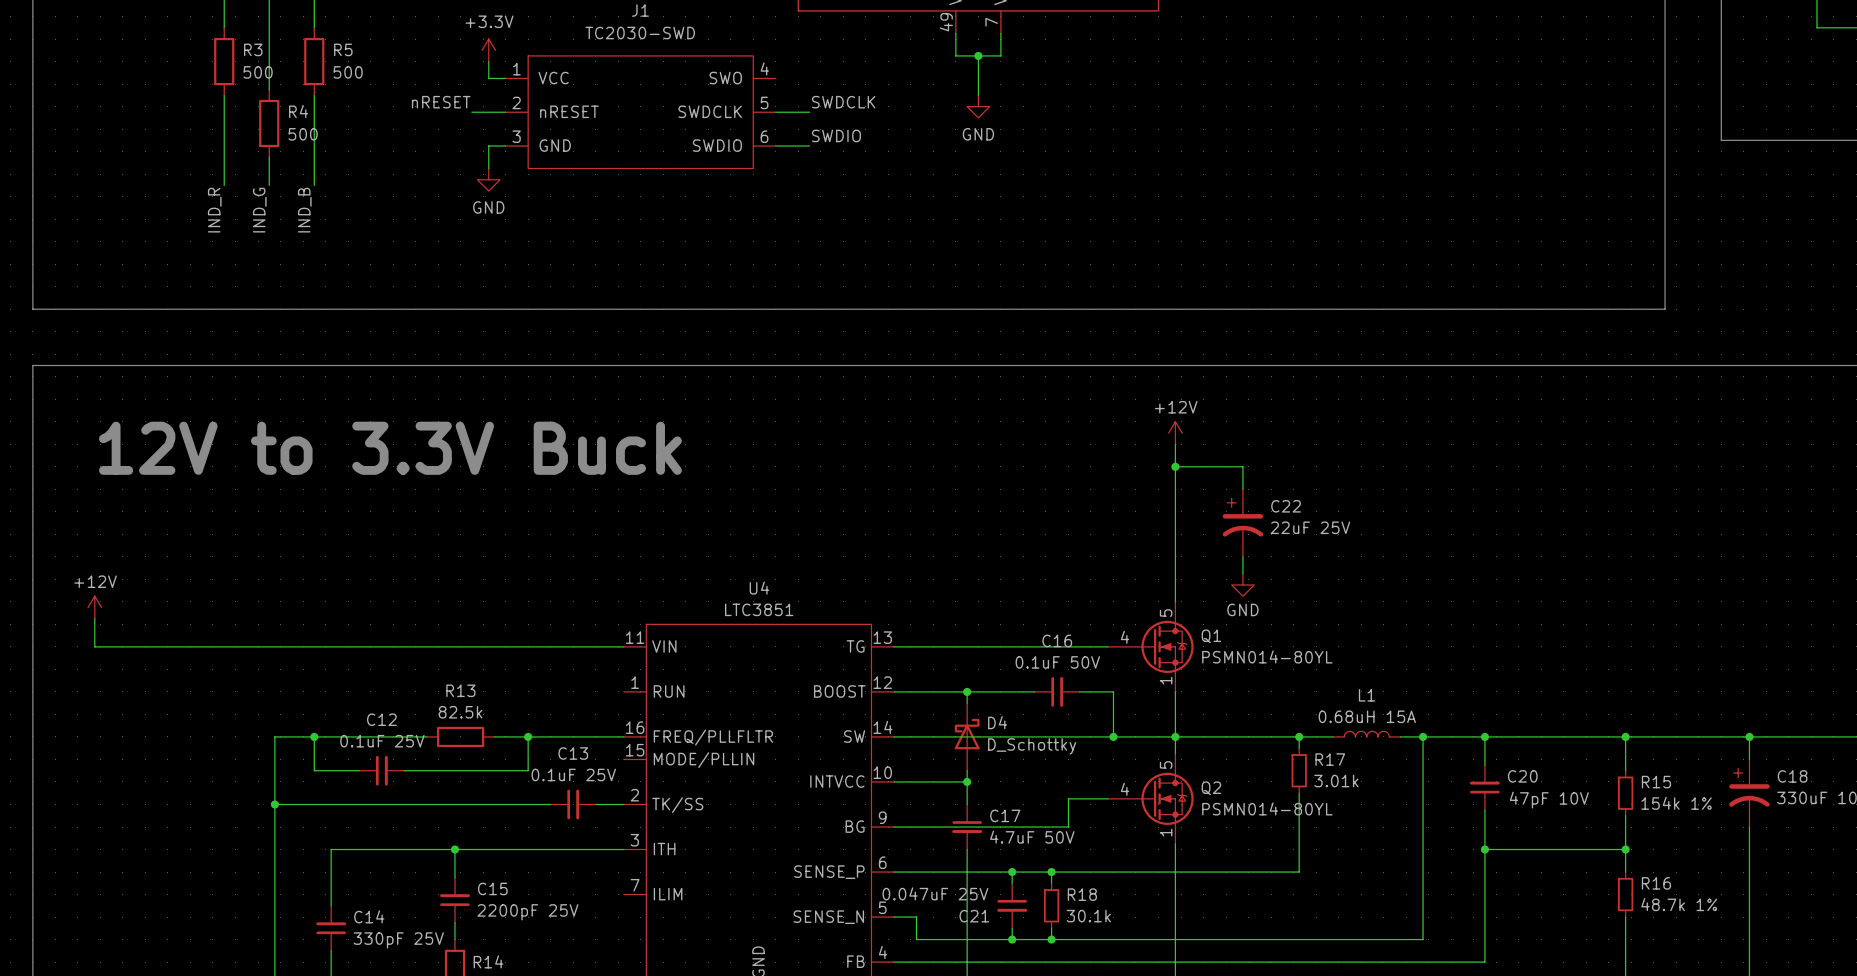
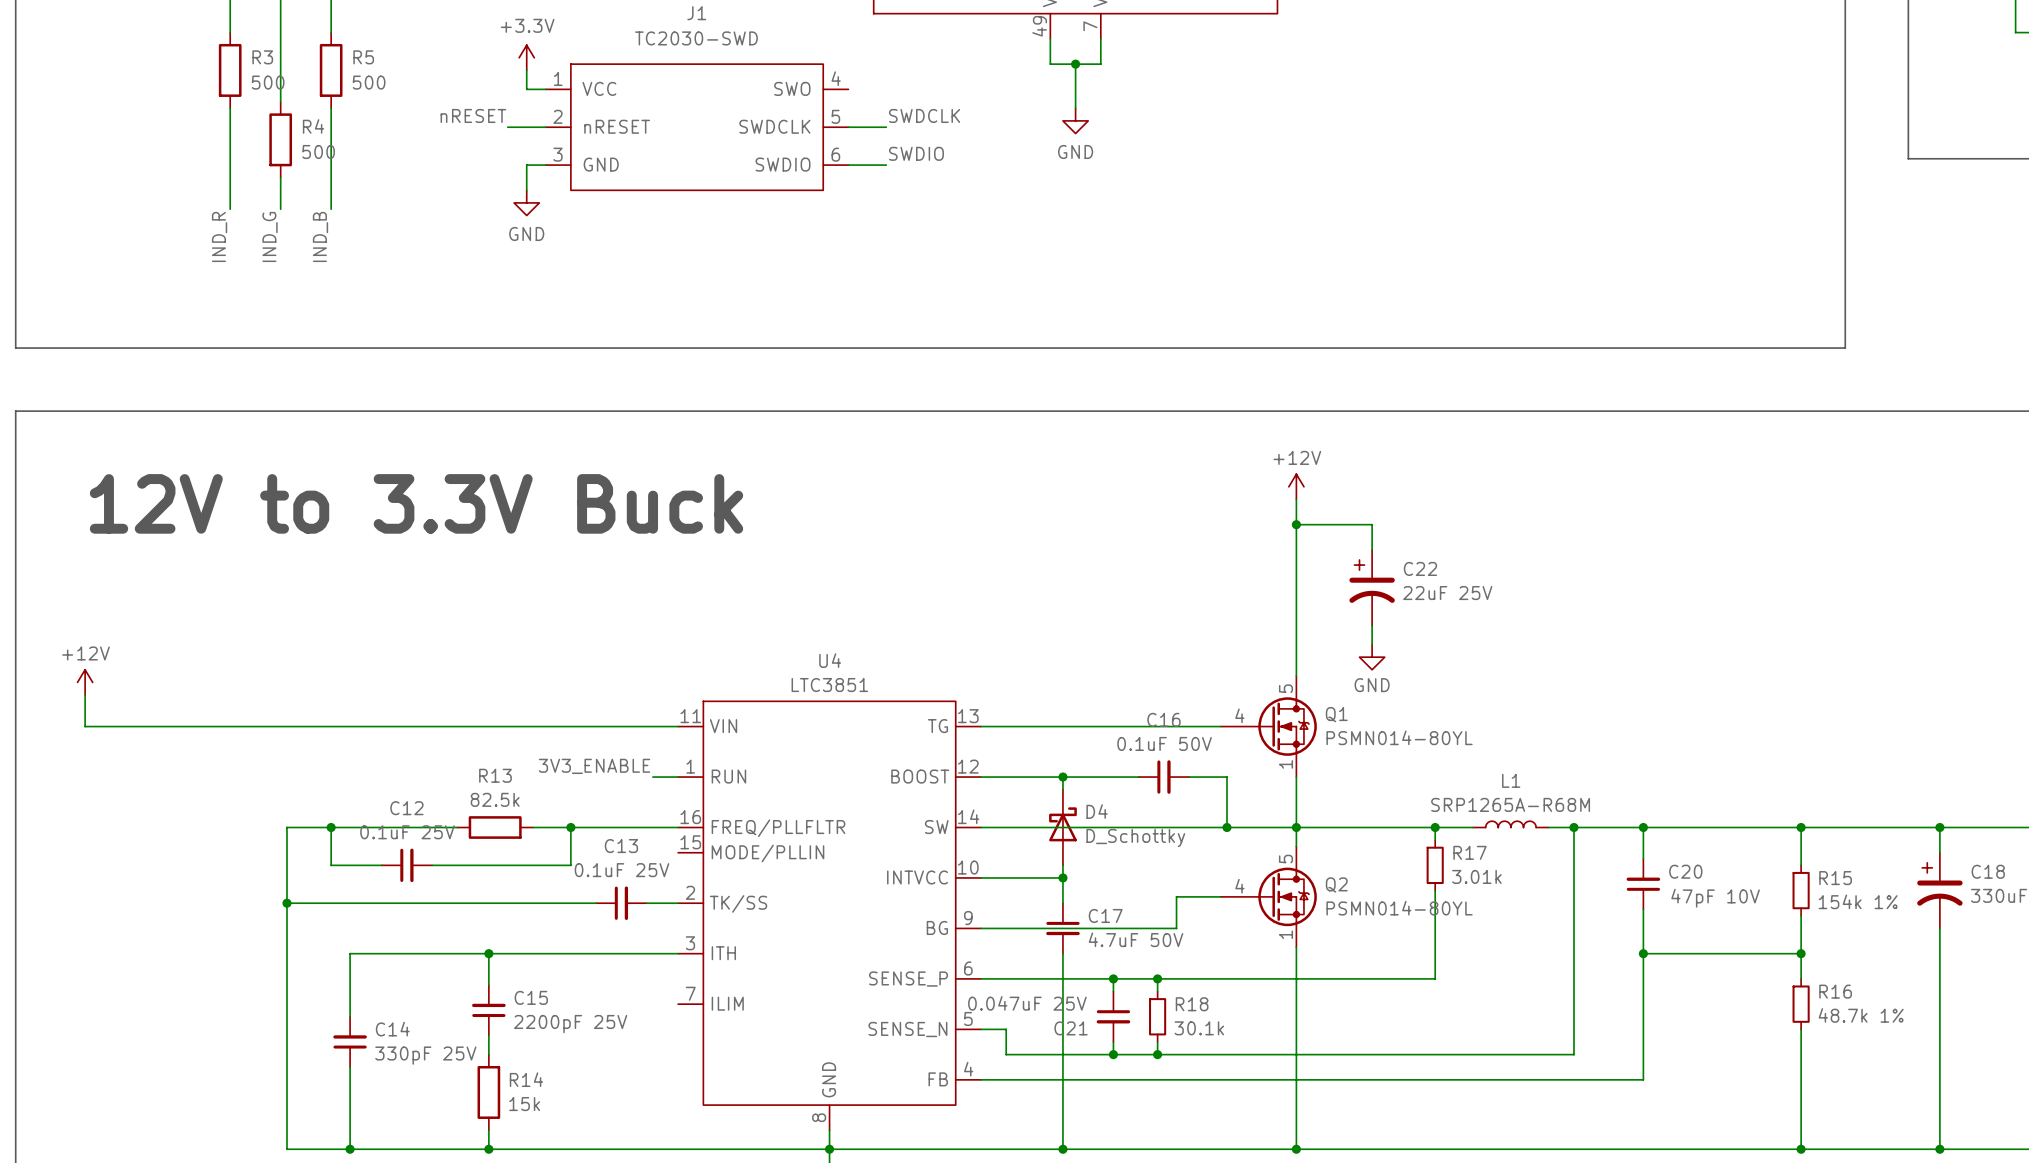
label: none -> 3V3_ENABLE (594, 766)
wire: none -> (652, 777) (678, 777)
L1 value: 0.68uH 15A (1367, 716) -> SRP1265A-R68M (1510, 804)

